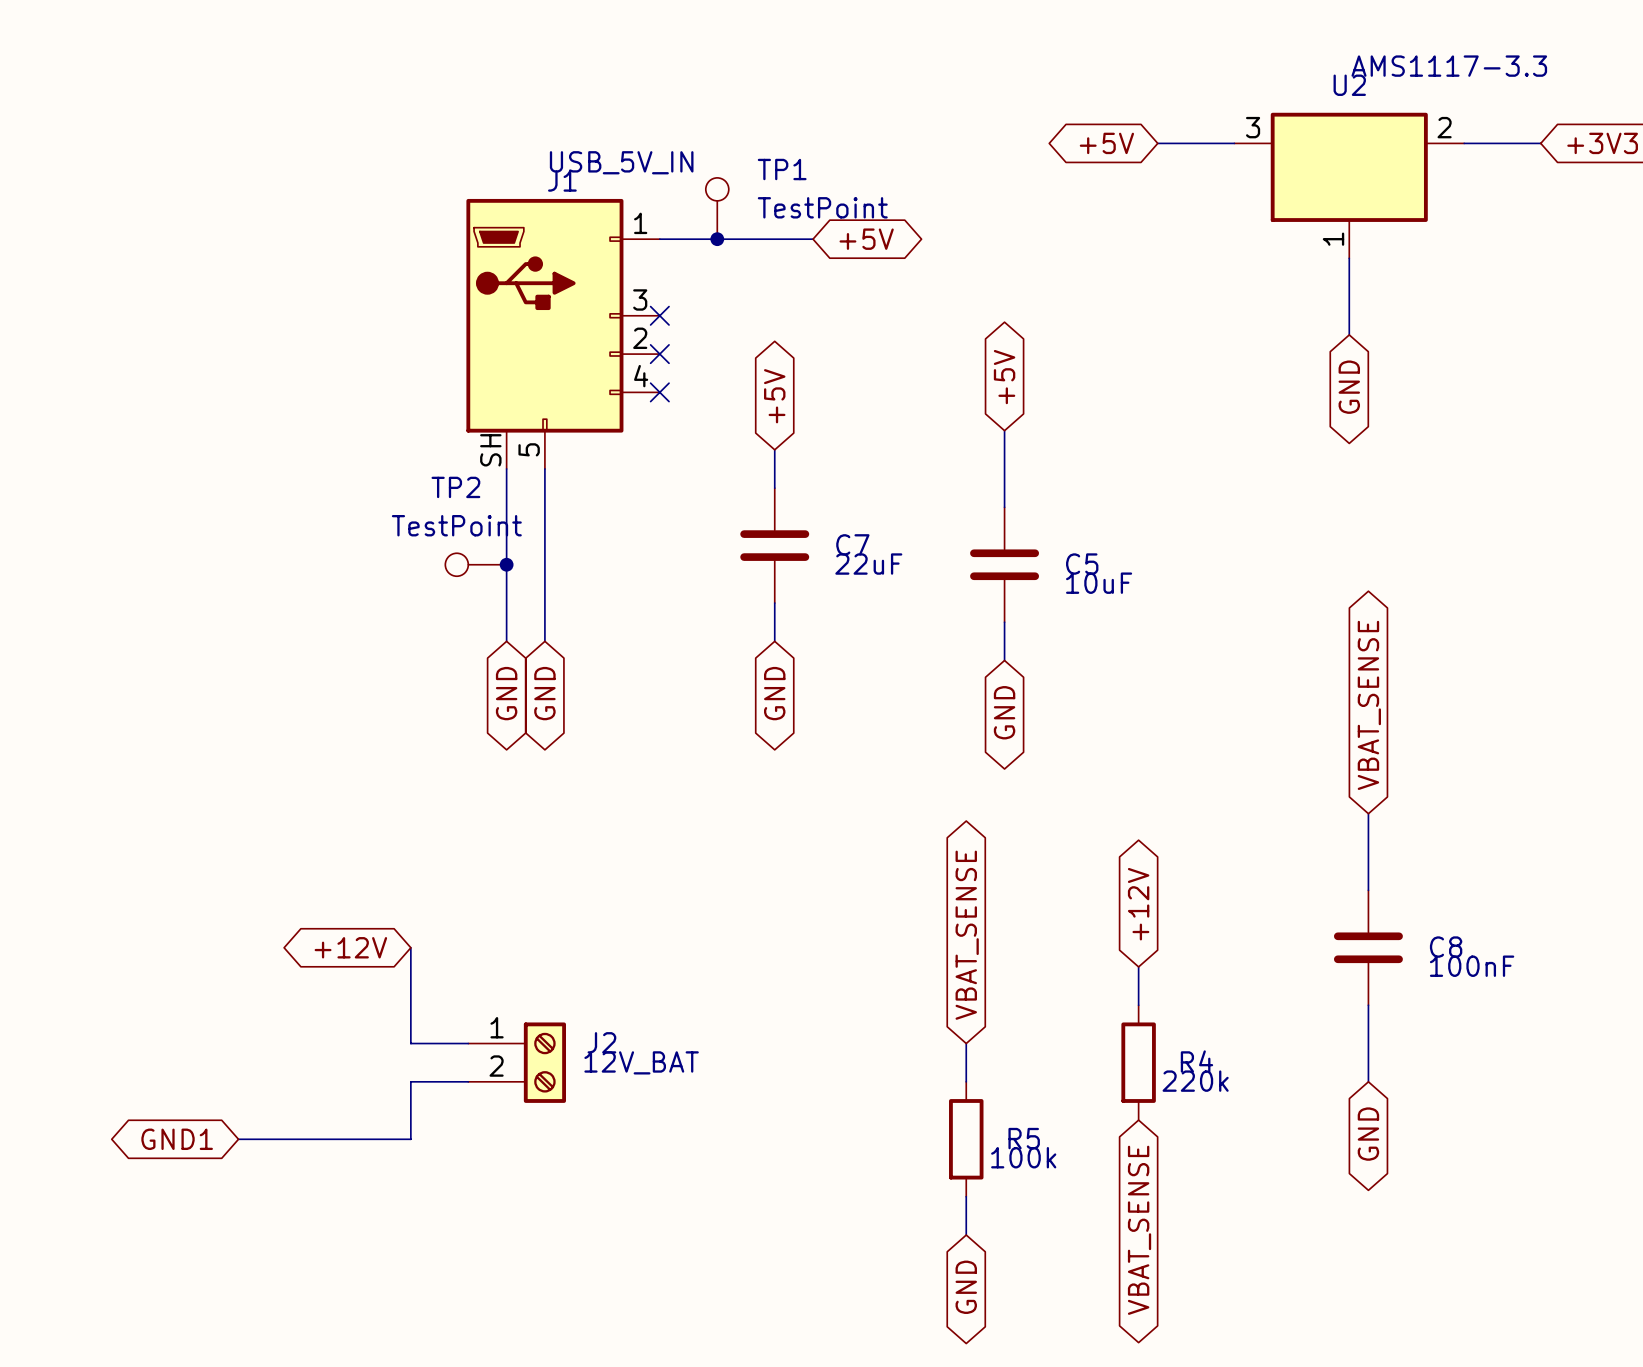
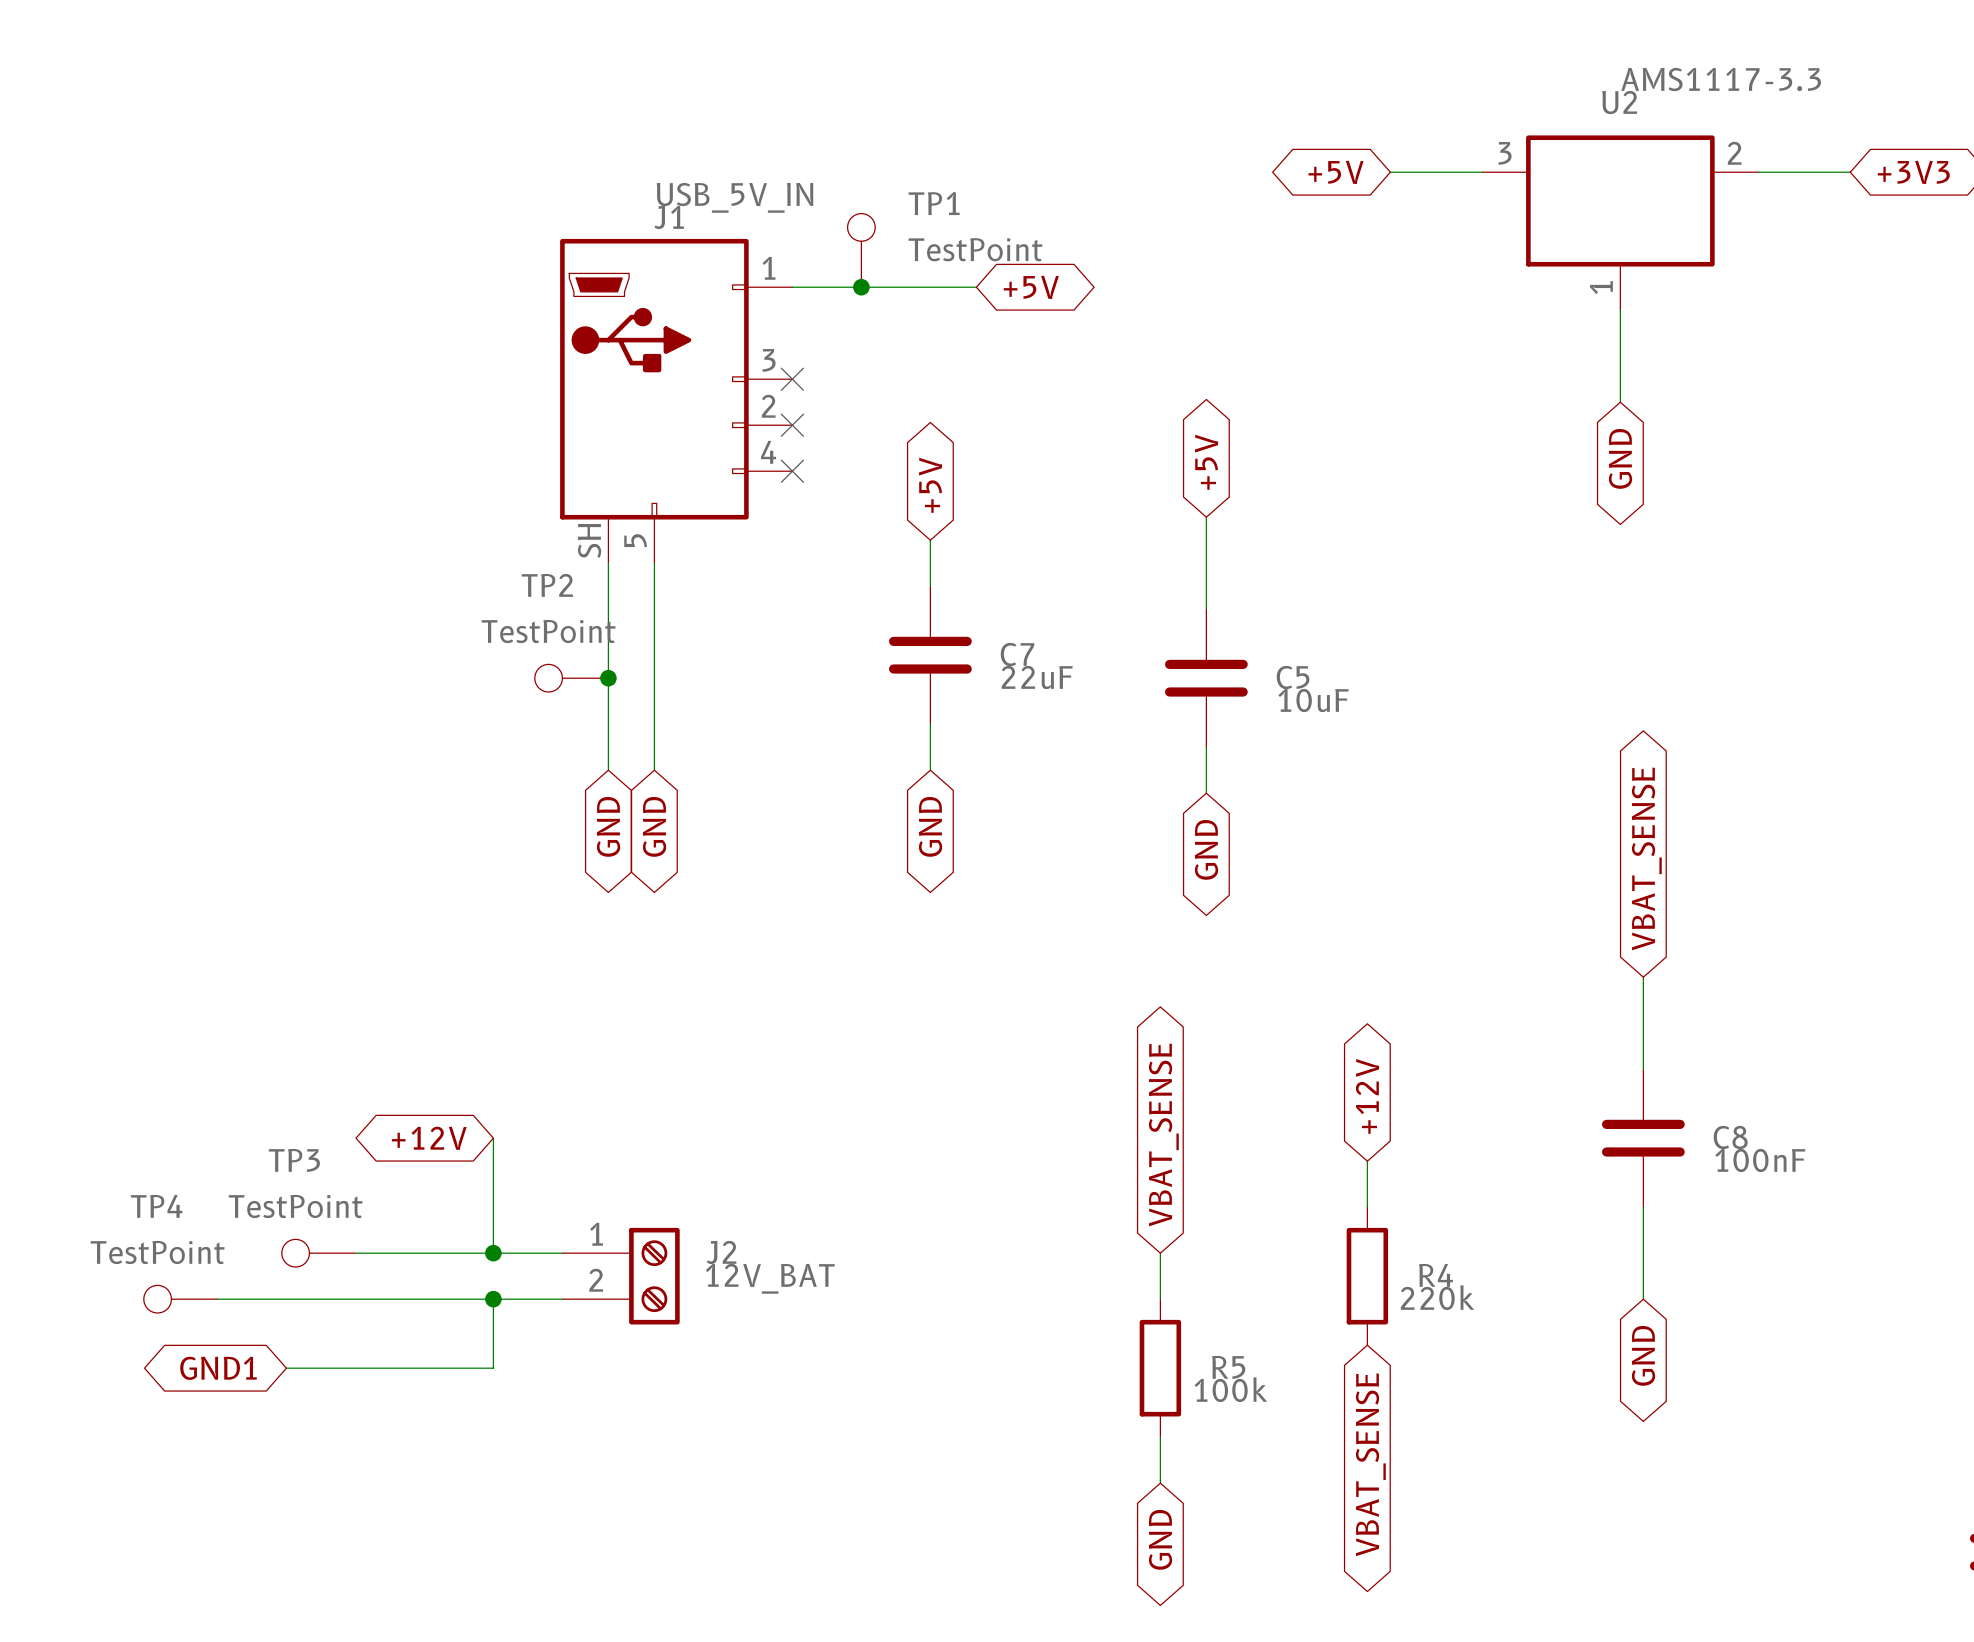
TP3: none -> TestPoint (318, 1253)
wire: none -> (355, 1253) (493, 1253)
junction: none -> (493, 1253)
TP4: none -> TestPoint (180, 1299)
wire: none -> (217, 1299) (493, 1299)
junction: none -> (493, 1299)

